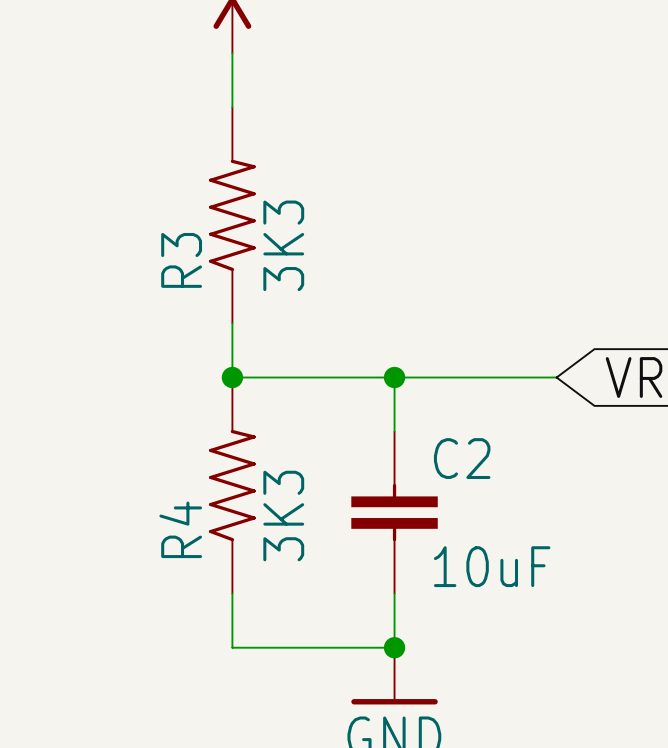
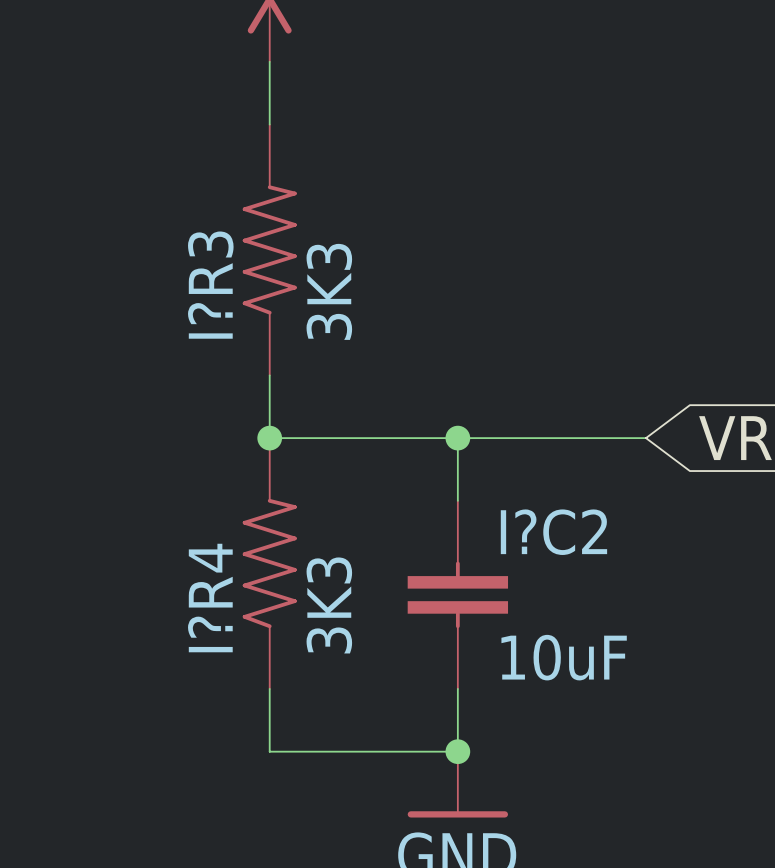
R3 name: R3 (181, 260) -> I?R3 (210, 285)
C2 name: C2 (462, 458) -> I?C2 (553, 532)
R4 name: R4 (180, 529) -> I?R4 (210, 598)

